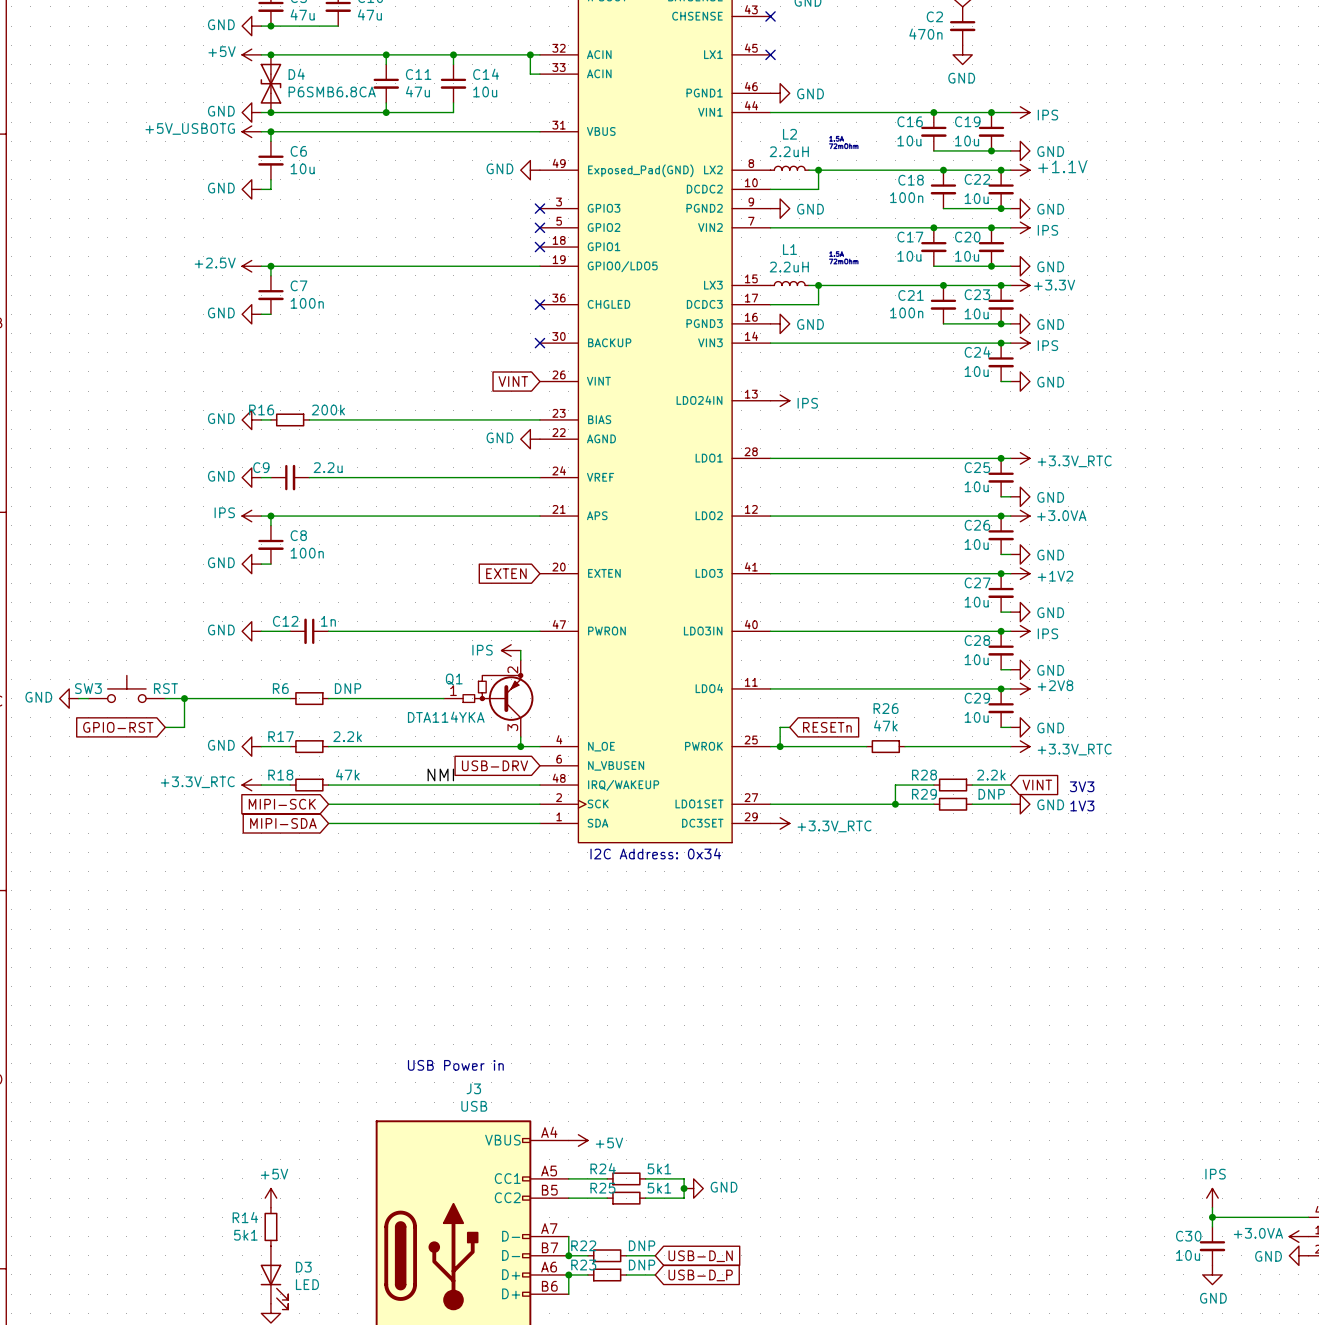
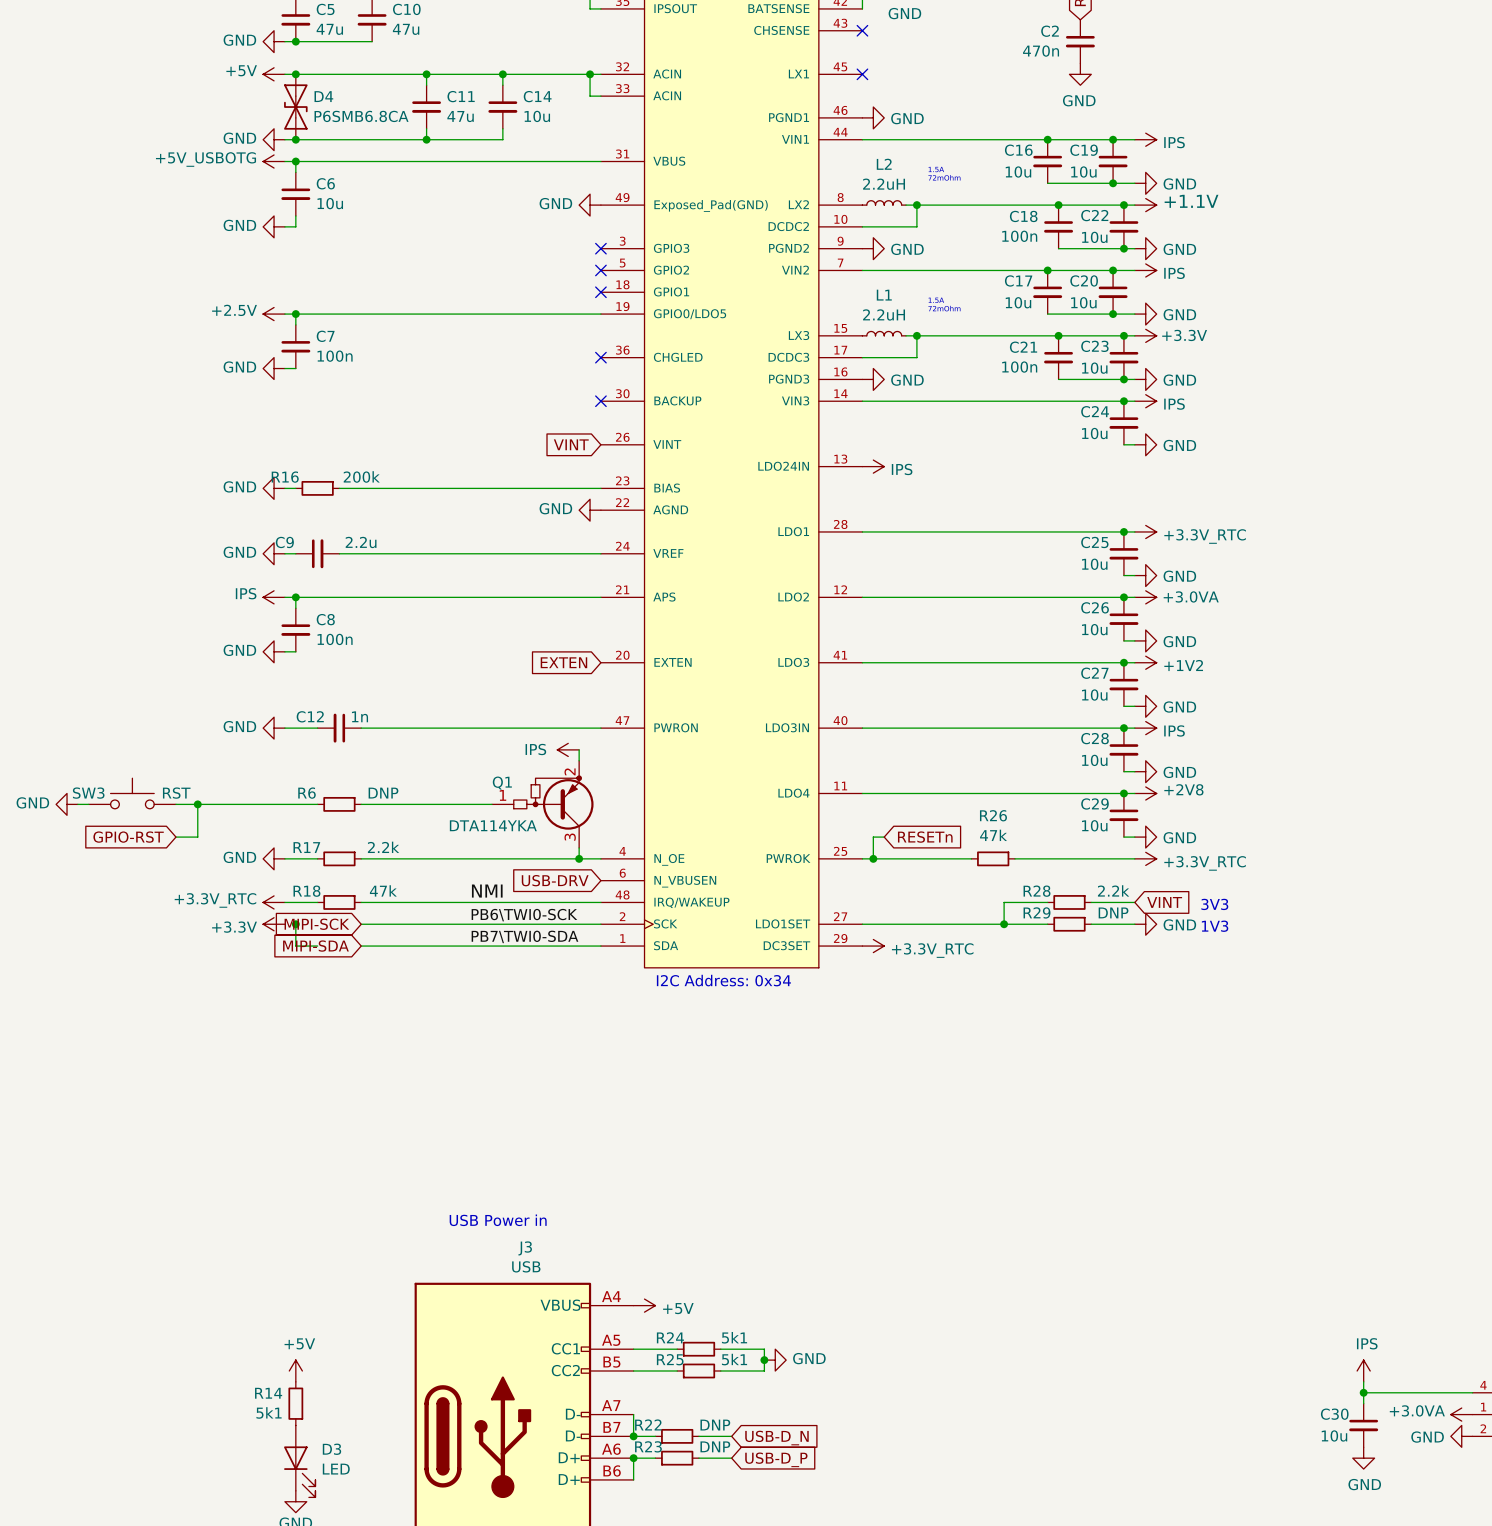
label: none -> PB6\TWI0-SCK (524, 915)
power symbol: none -> +3.3V (274, 924)
wire: none -> (295, 924) (295, 946) (317, 946)
junction: none -> (295, 924)
label: none -> PB7\TWI0-SDA (524, 936)

